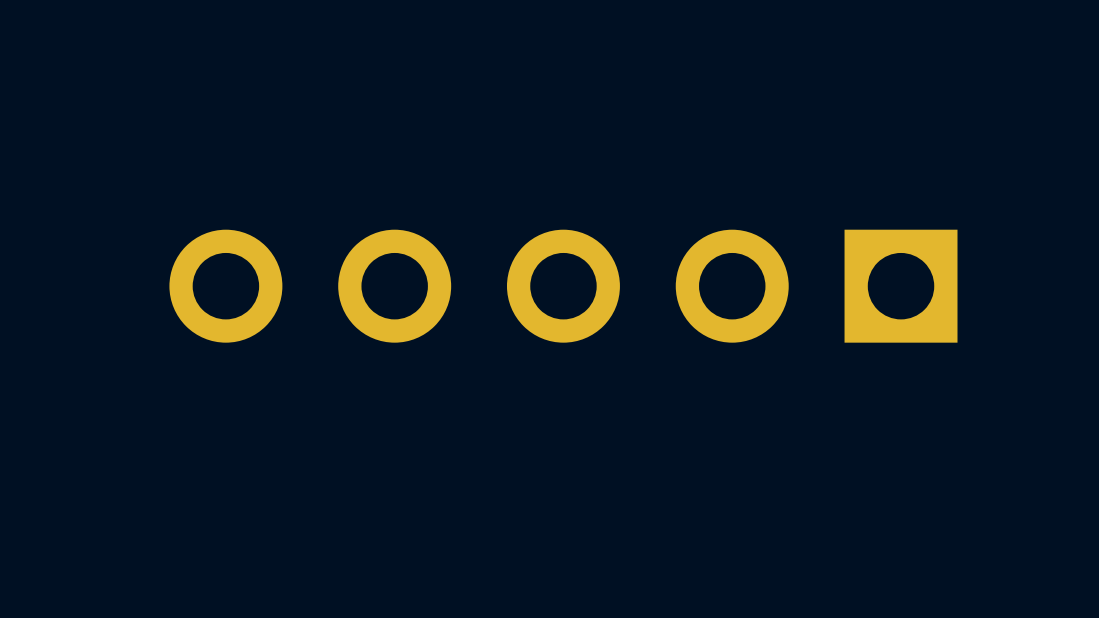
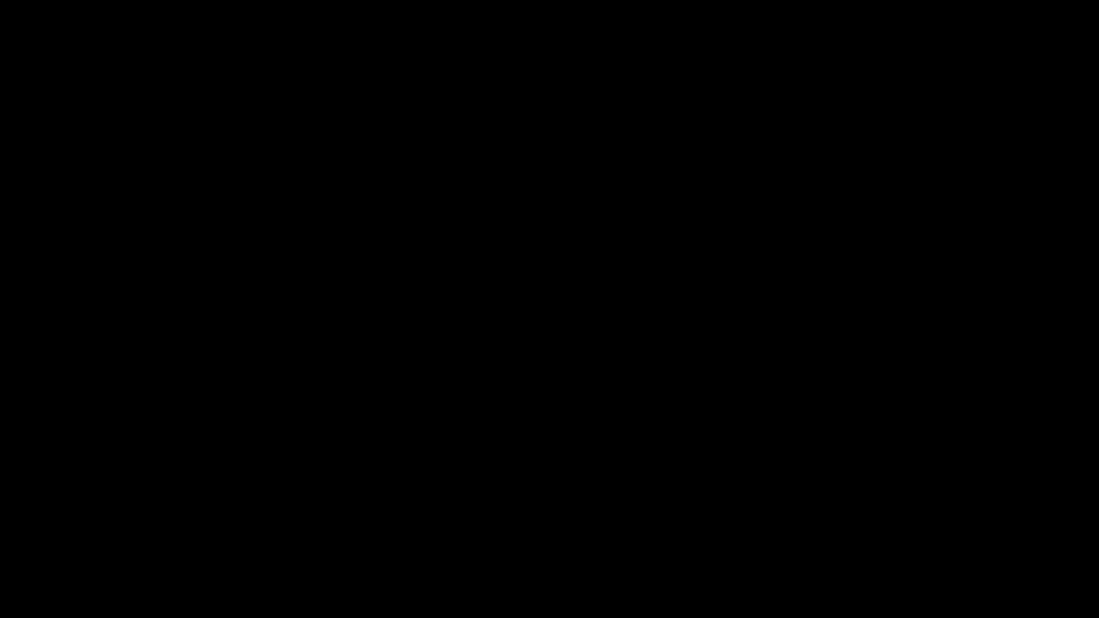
part: (563, 286) -> none

